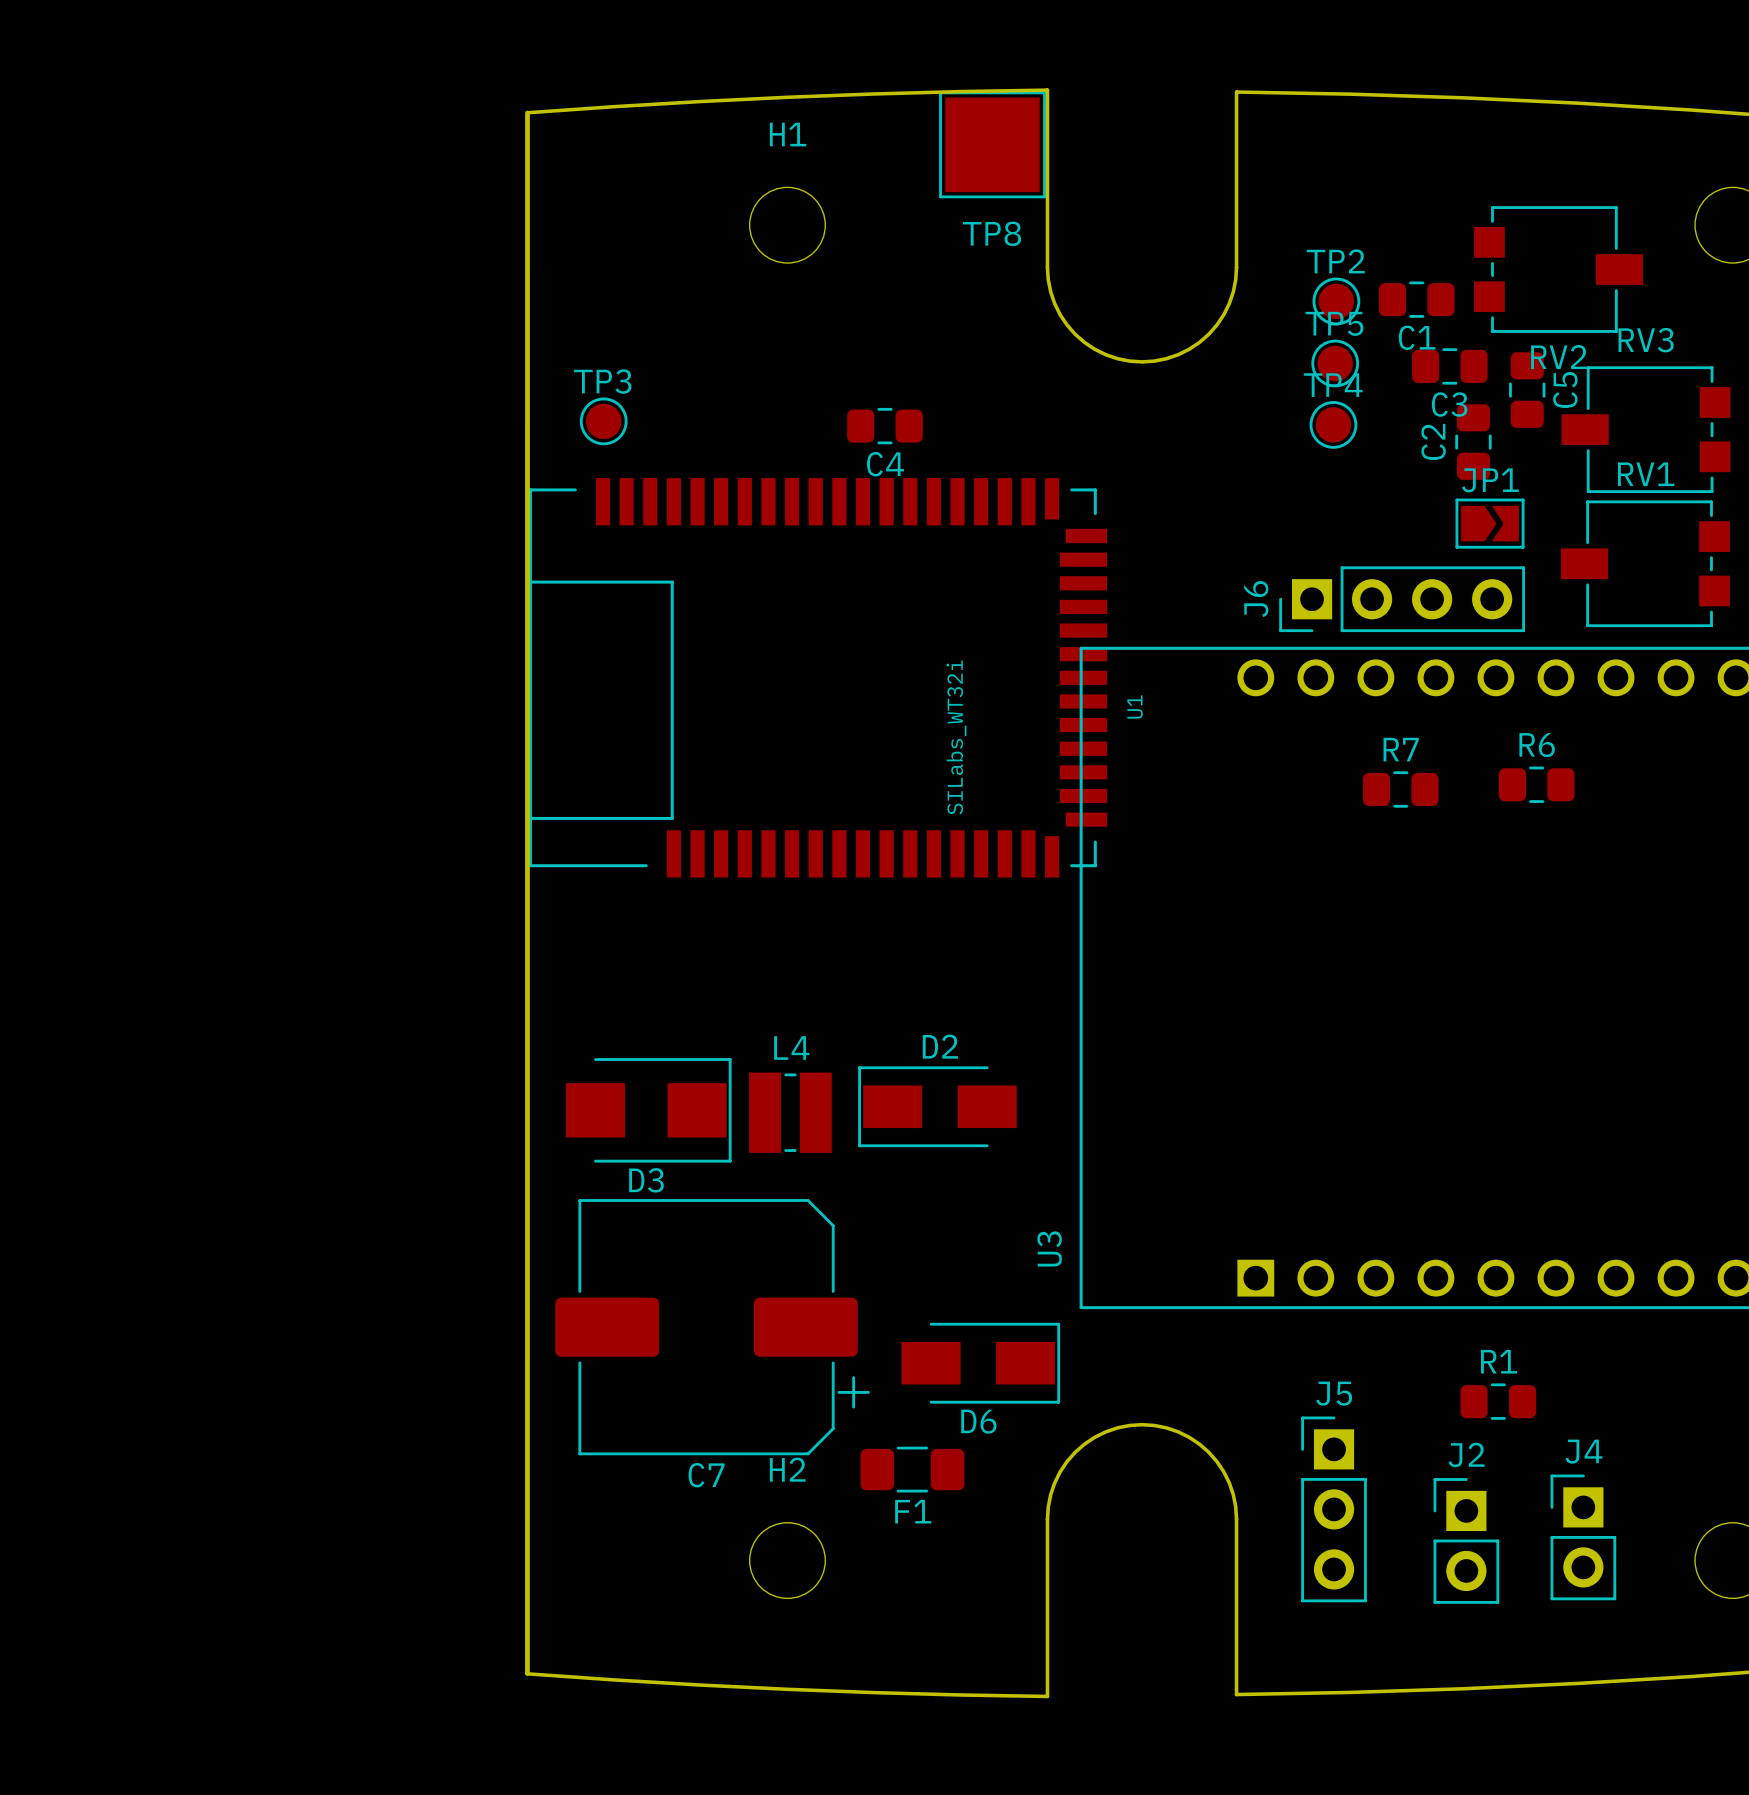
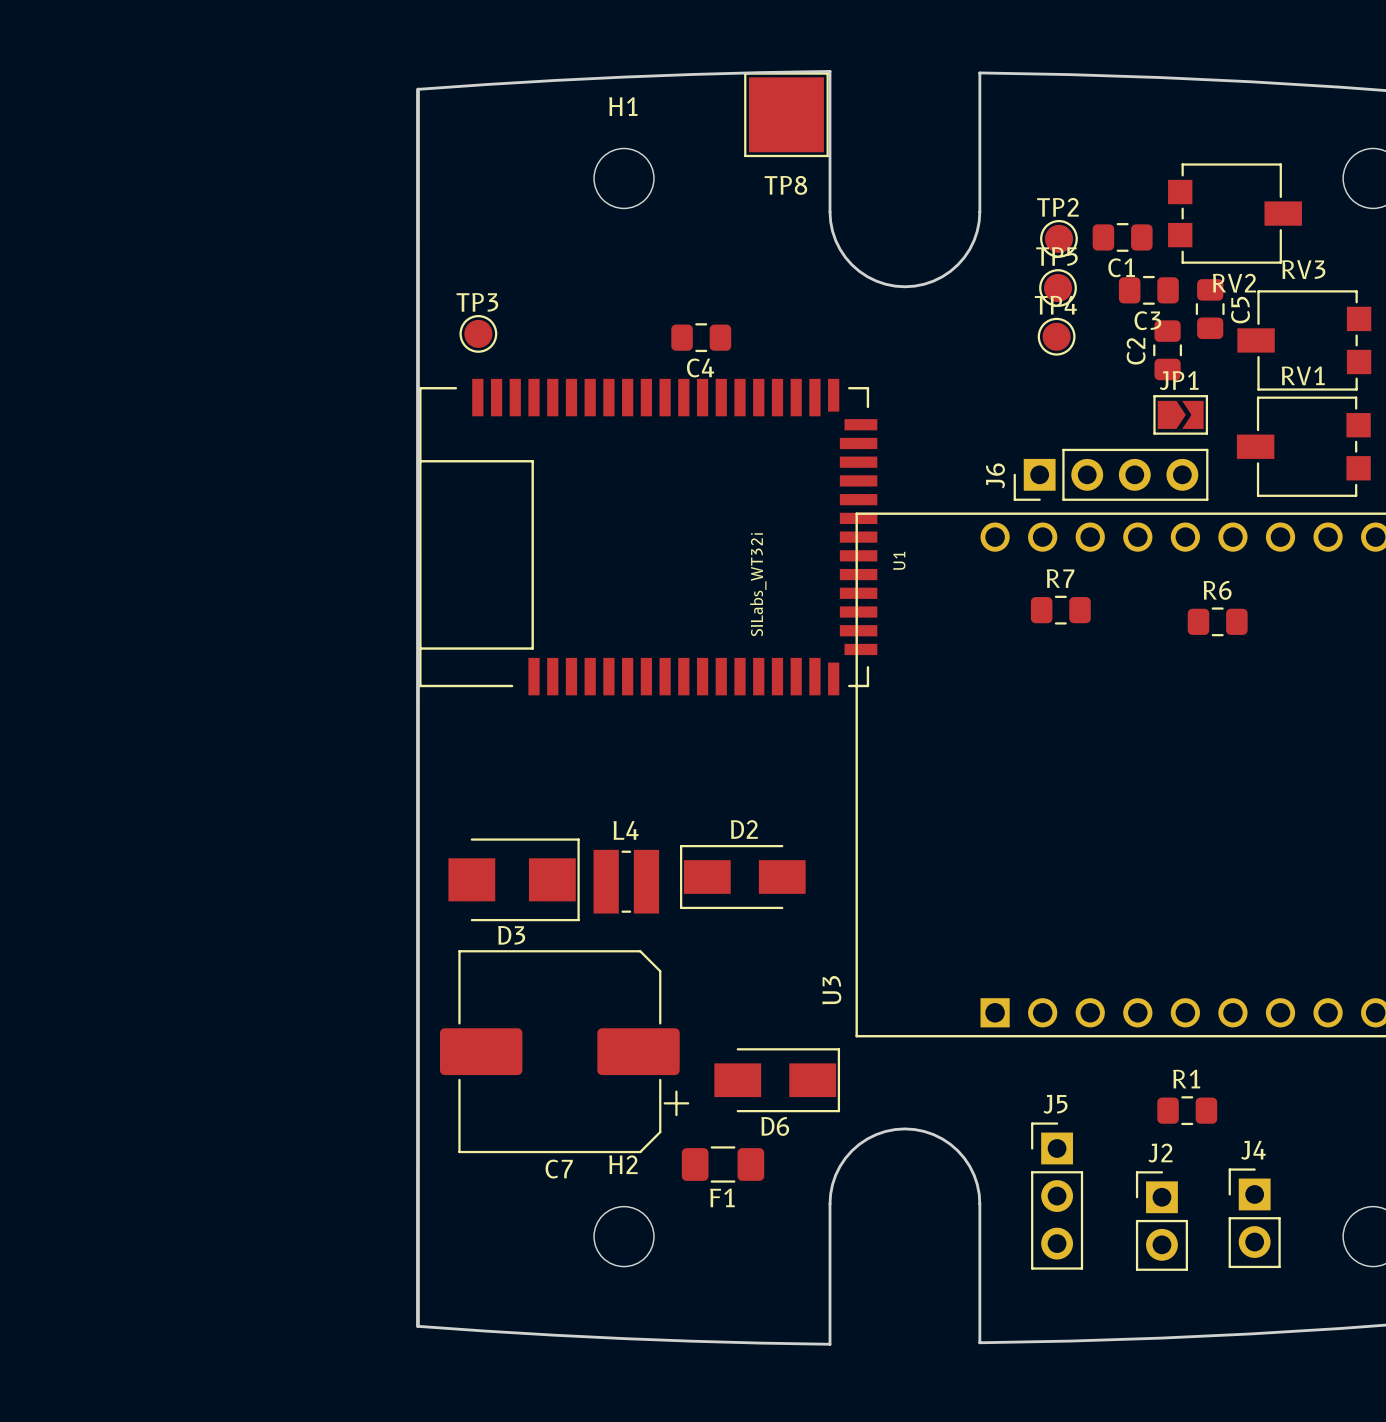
R7 position: (1400, 789) -> (1060, 610)

